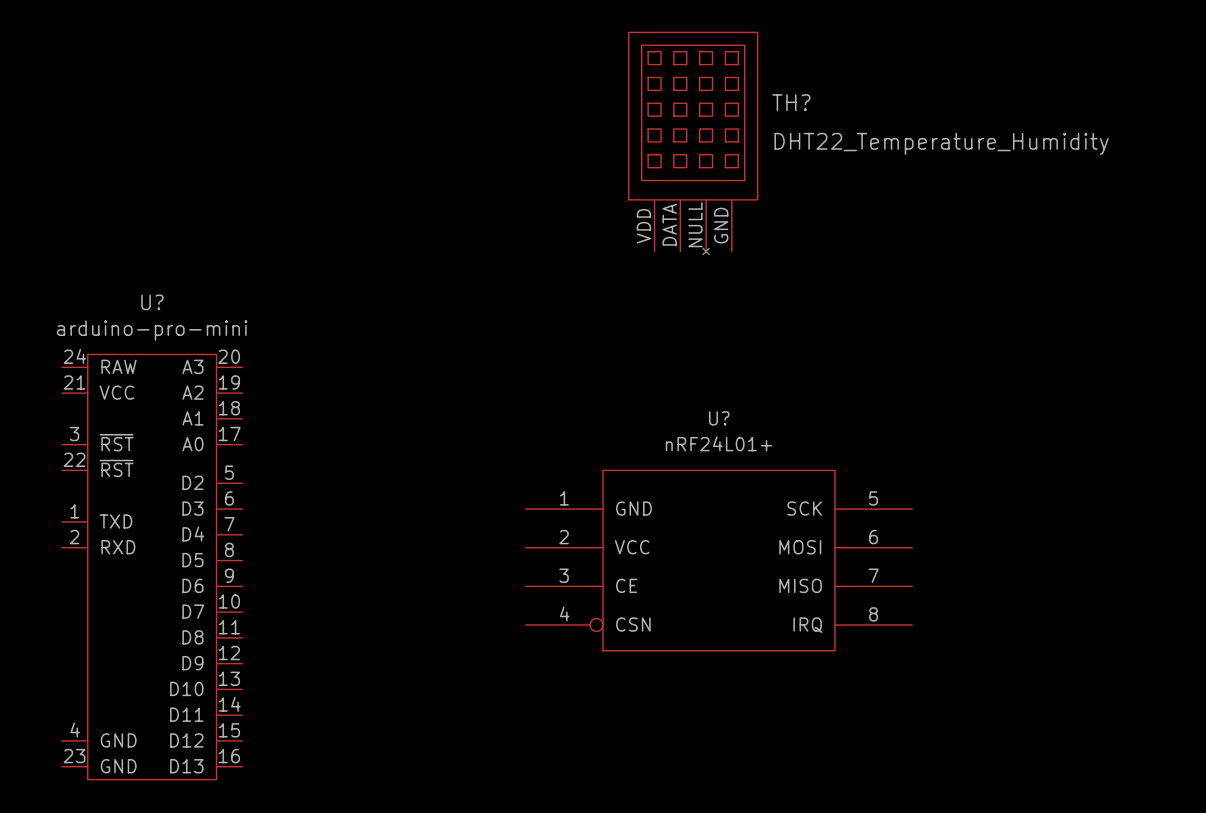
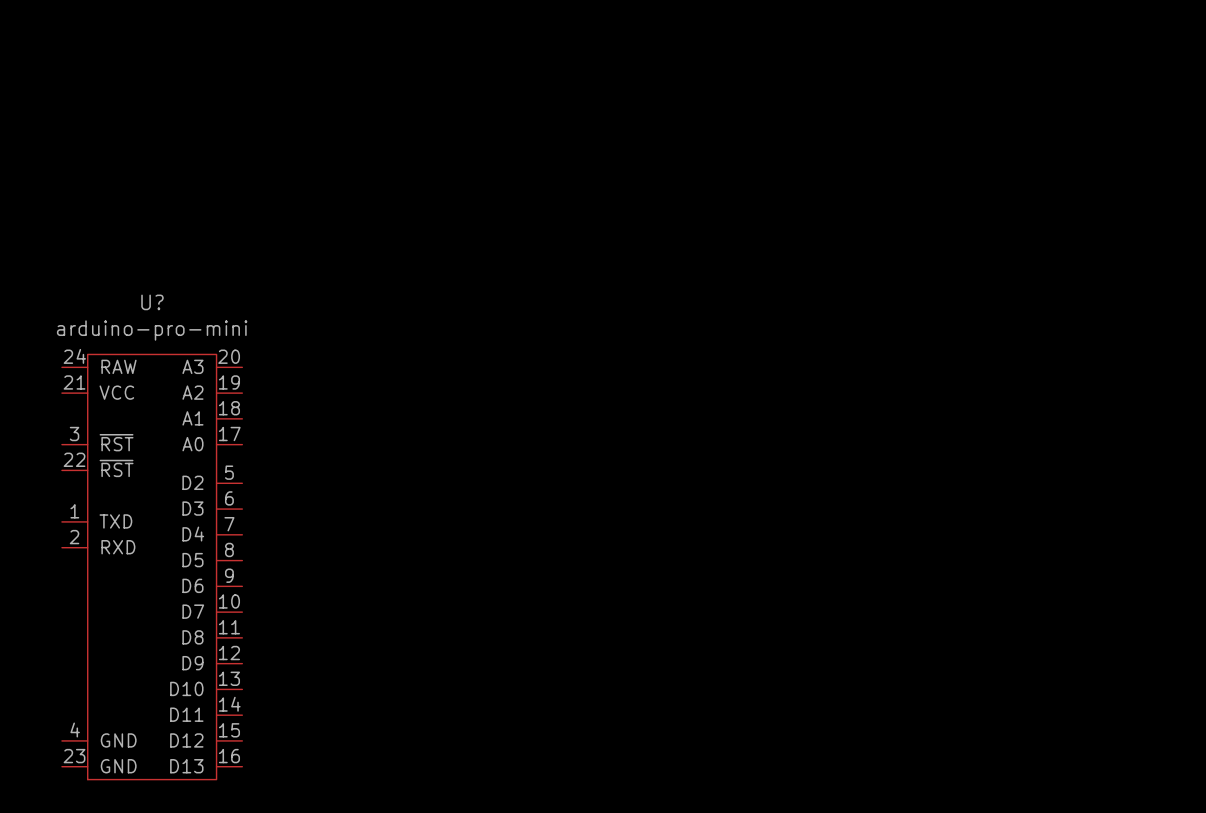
TH?: DHT22_Temperature_Humidity (693, 143) -> none
U?: nRF24L01+ (718, 560) -> none

